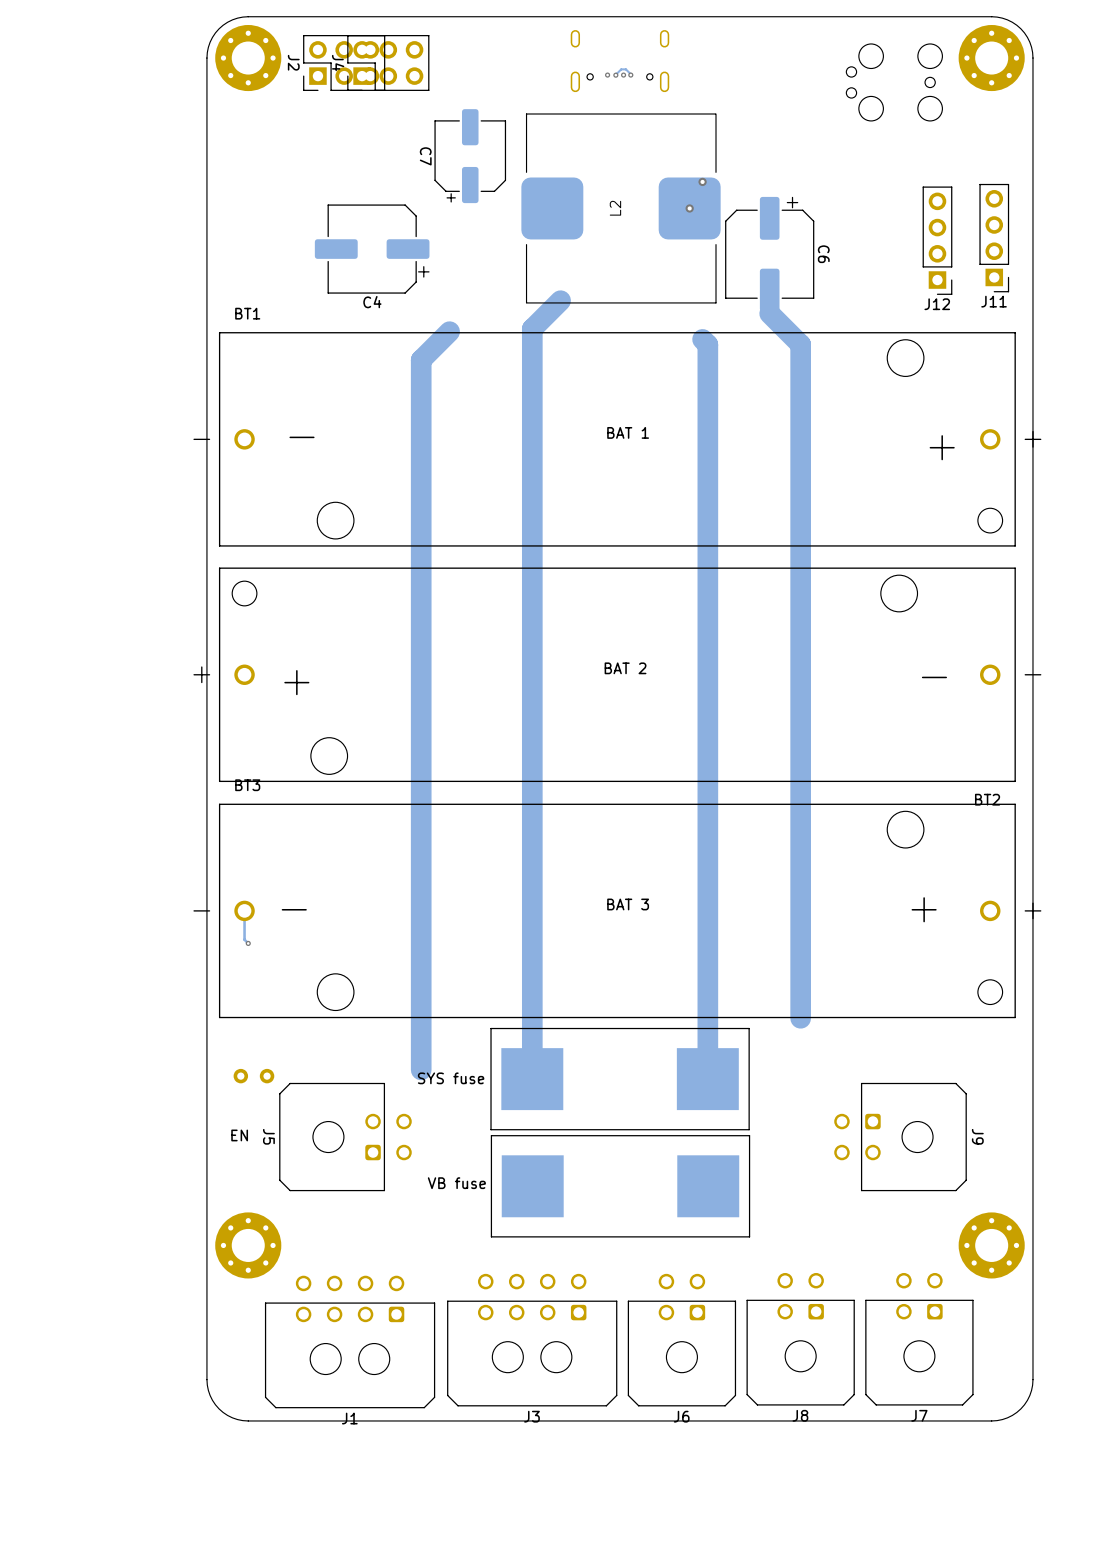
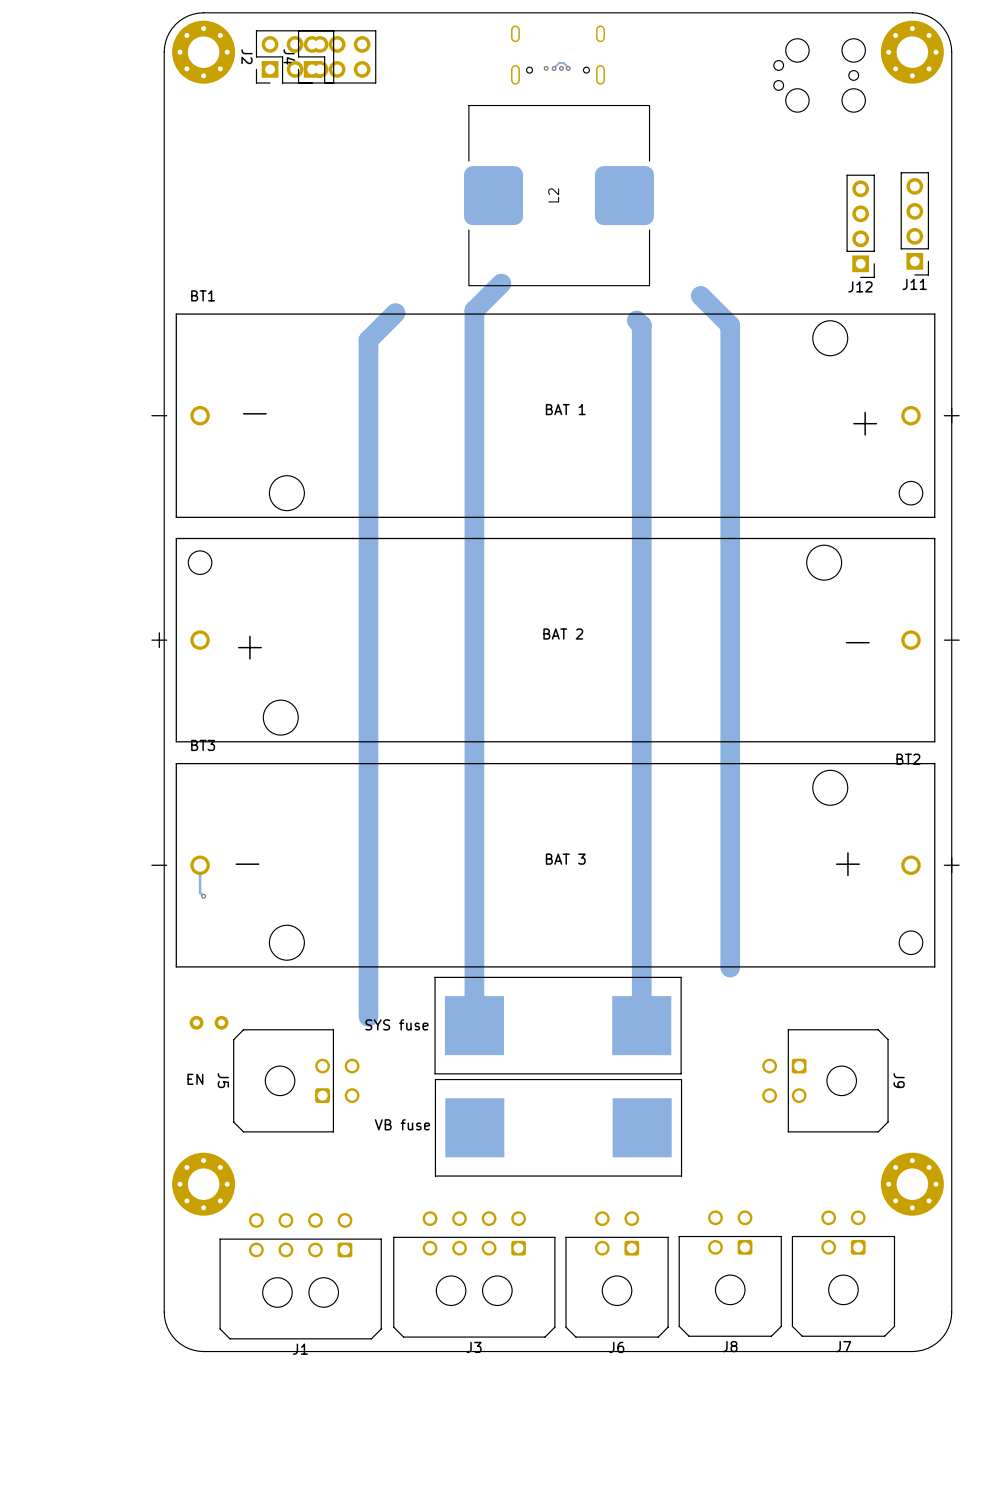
C7: (470, 156) -> none
via: (702, 181) -> none
via: (689, 208) -> none
C4: (372, 249) -> none
C6: (769, 254) -> none

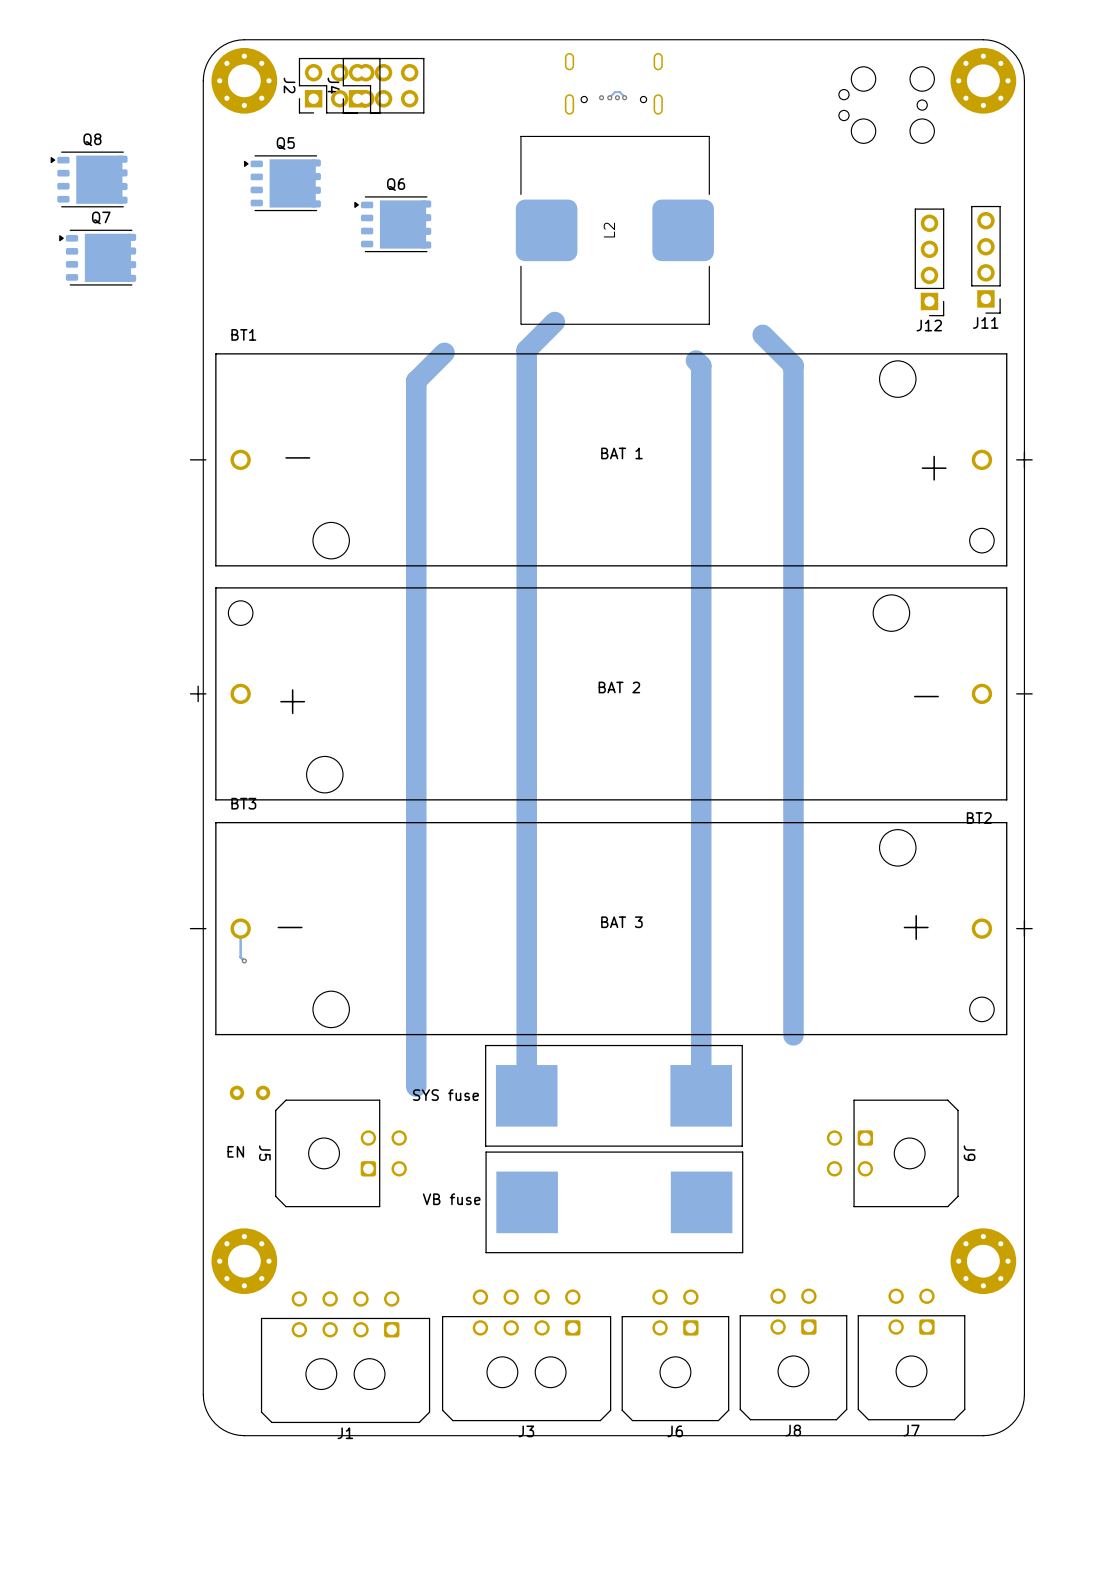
Q8: none -> (89, 179)
Q5: none -> (282, 183)
Q6: none -> (392, 224)
Q7: none -> (97, 257)

